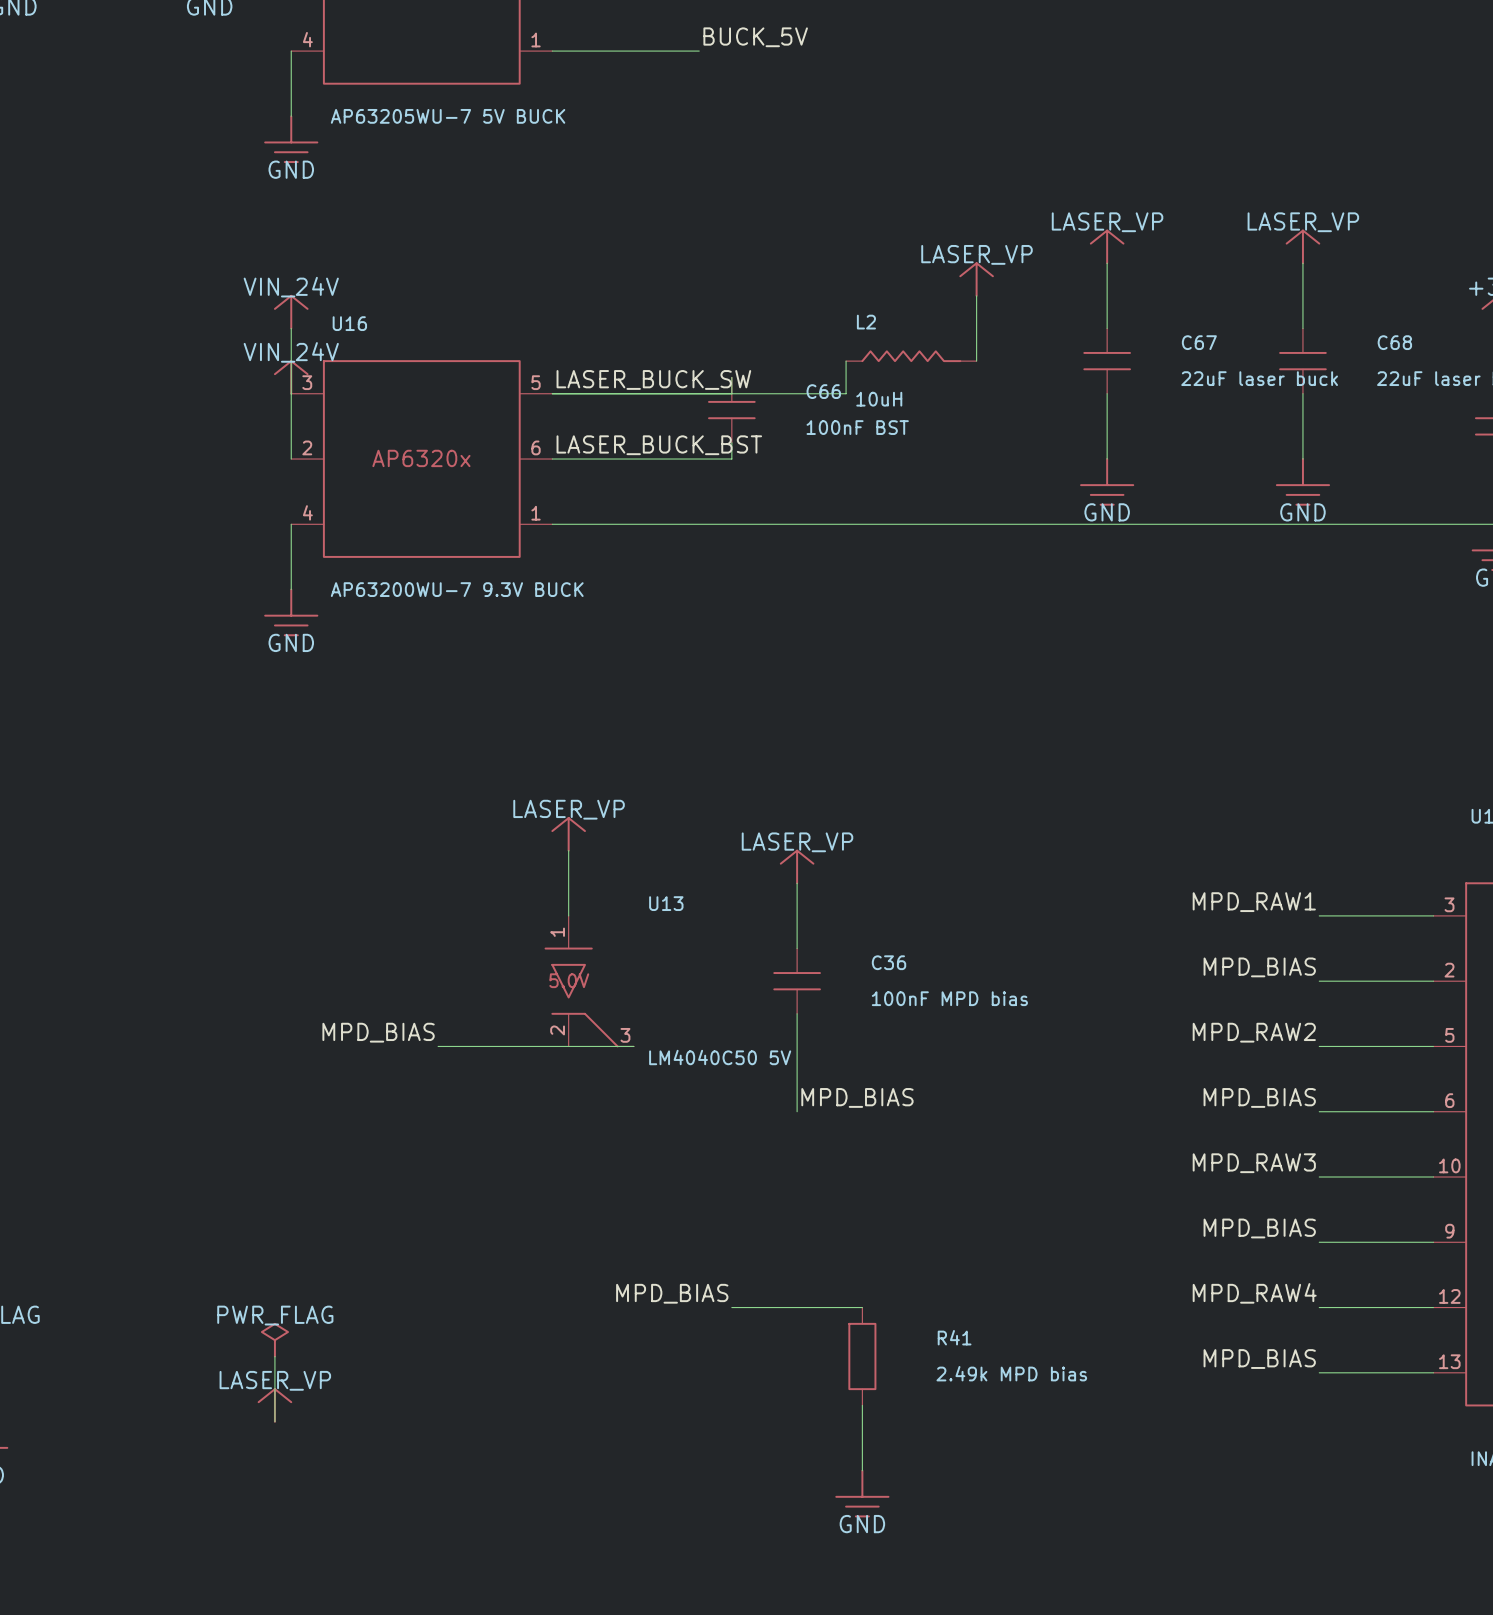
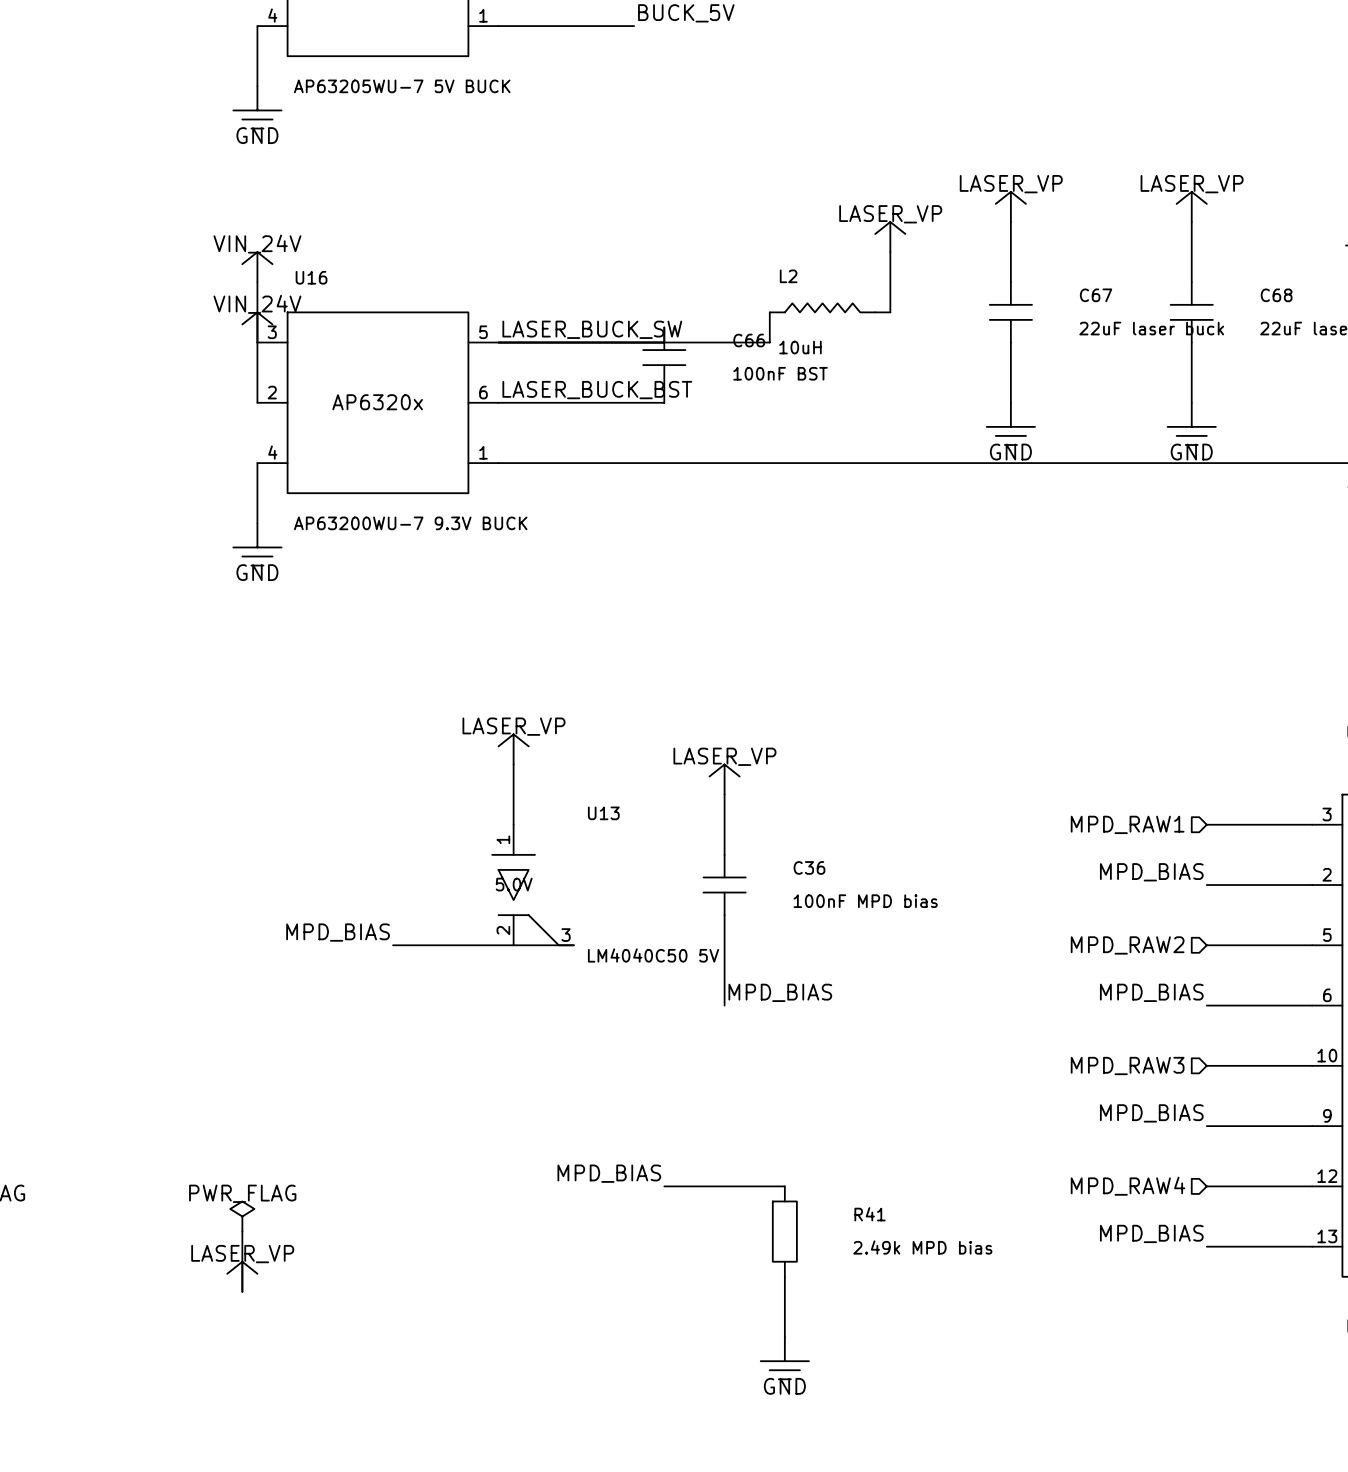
label: MPD_RAW1 (1254, 902) -> none
hierarchical label: none -> MPD_RAW1 (1127, 824)
label: MPD_RAW2 (1254, 1032) -> none
hierarchical label: none -> MPD_RAW2 (1127, 945)
label: MPD_RAW3 (1254, 1163) -> none
hierarchical label: none -> MPD_RAW3 (1127, 1065)
label: MPD_RAW4 (1254, 1293) -> none
hierarchical label: none -> MPD_RAW4 (1127, 1186)

